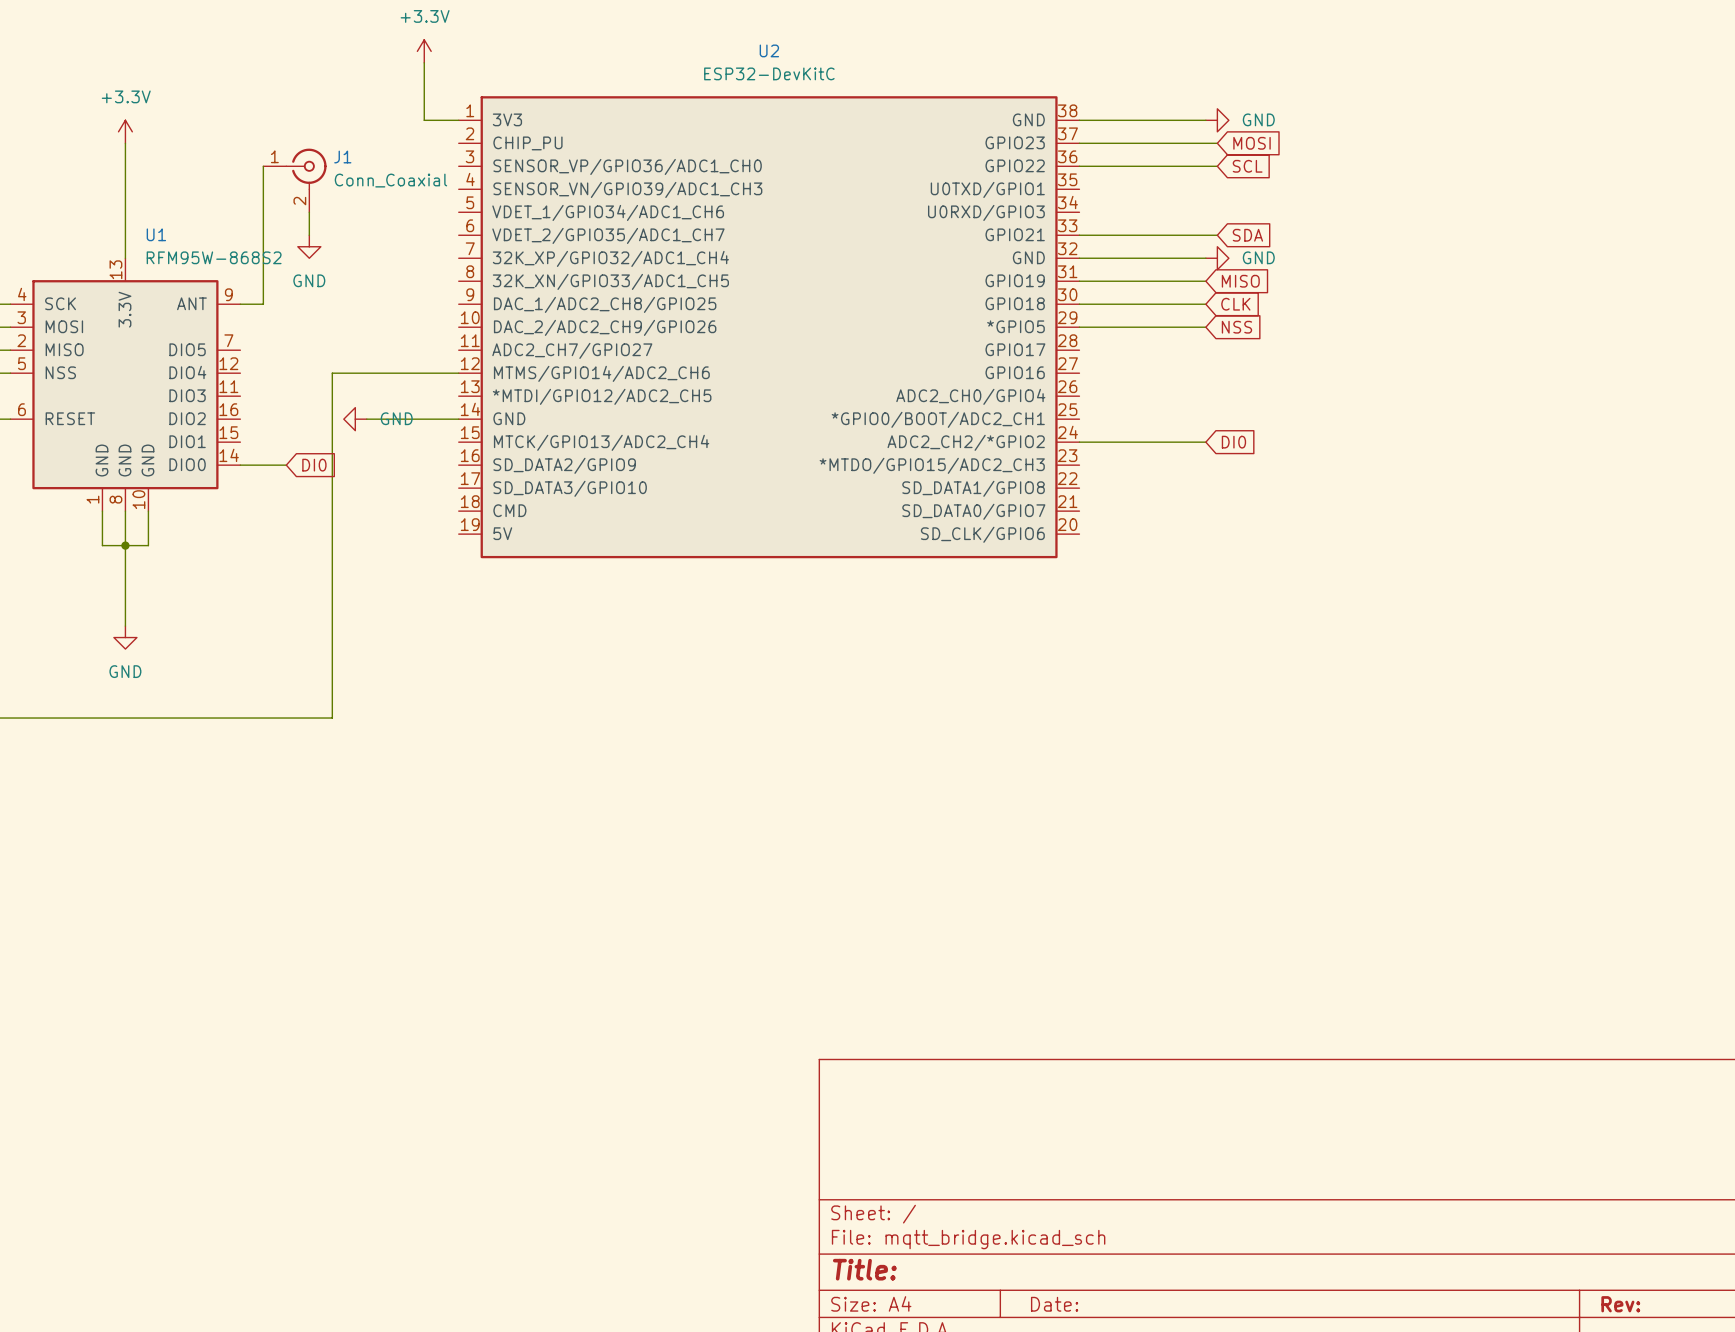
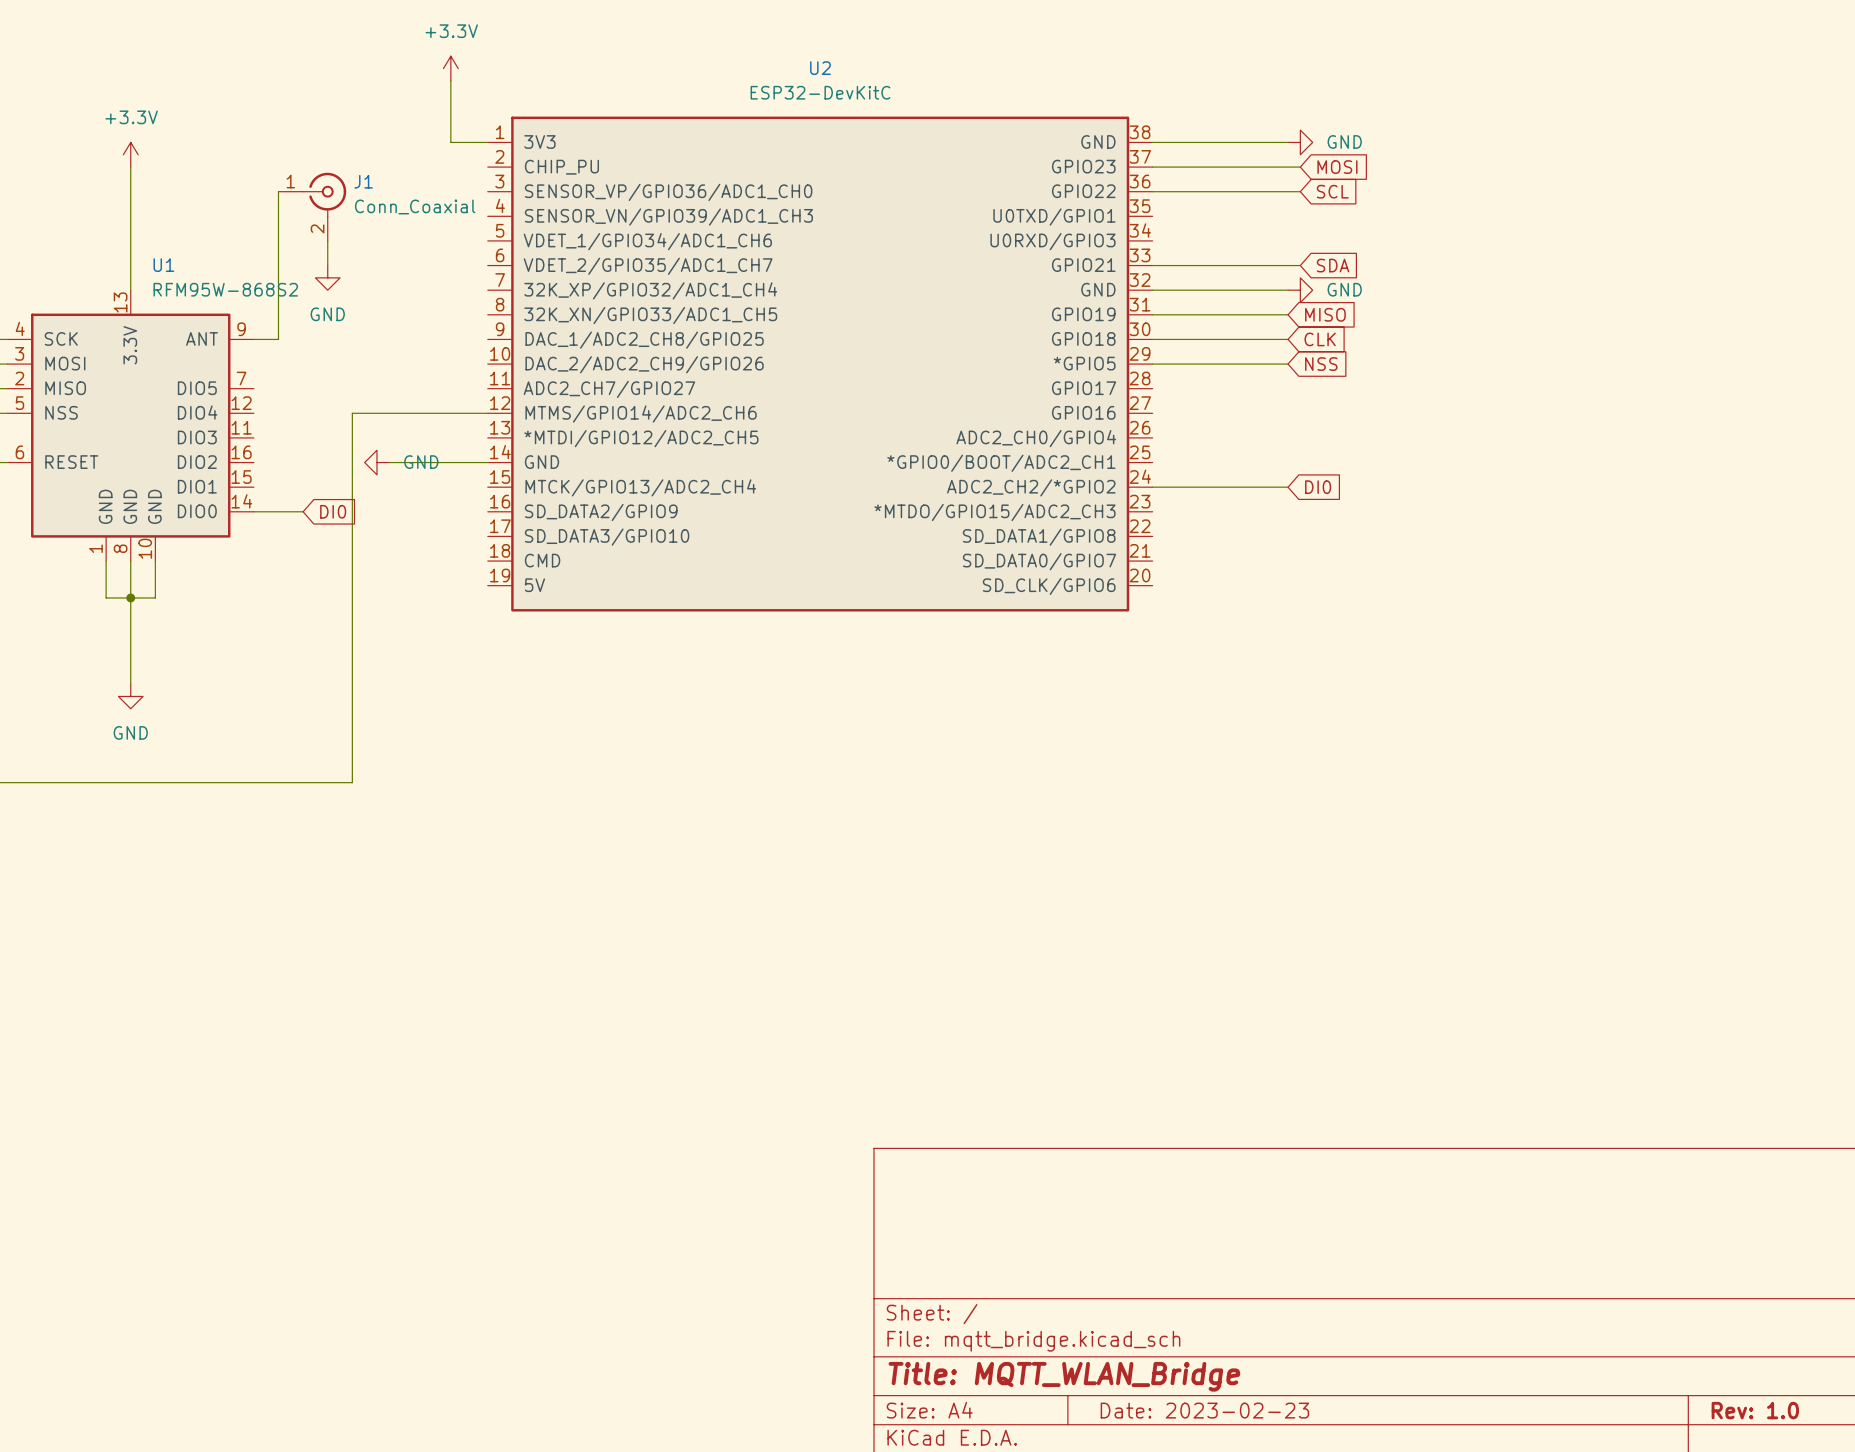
title block: Title: (864, 1269) -> Title: MQTT_WLAN_Bridge (1064, 1376)
title block: Date: (1054, 1304) -> Date: 2023-02-23 (1204, 1410)
title block: Rev: (1620, 1304) -> Rev: 1.0 (1755, 1410)

